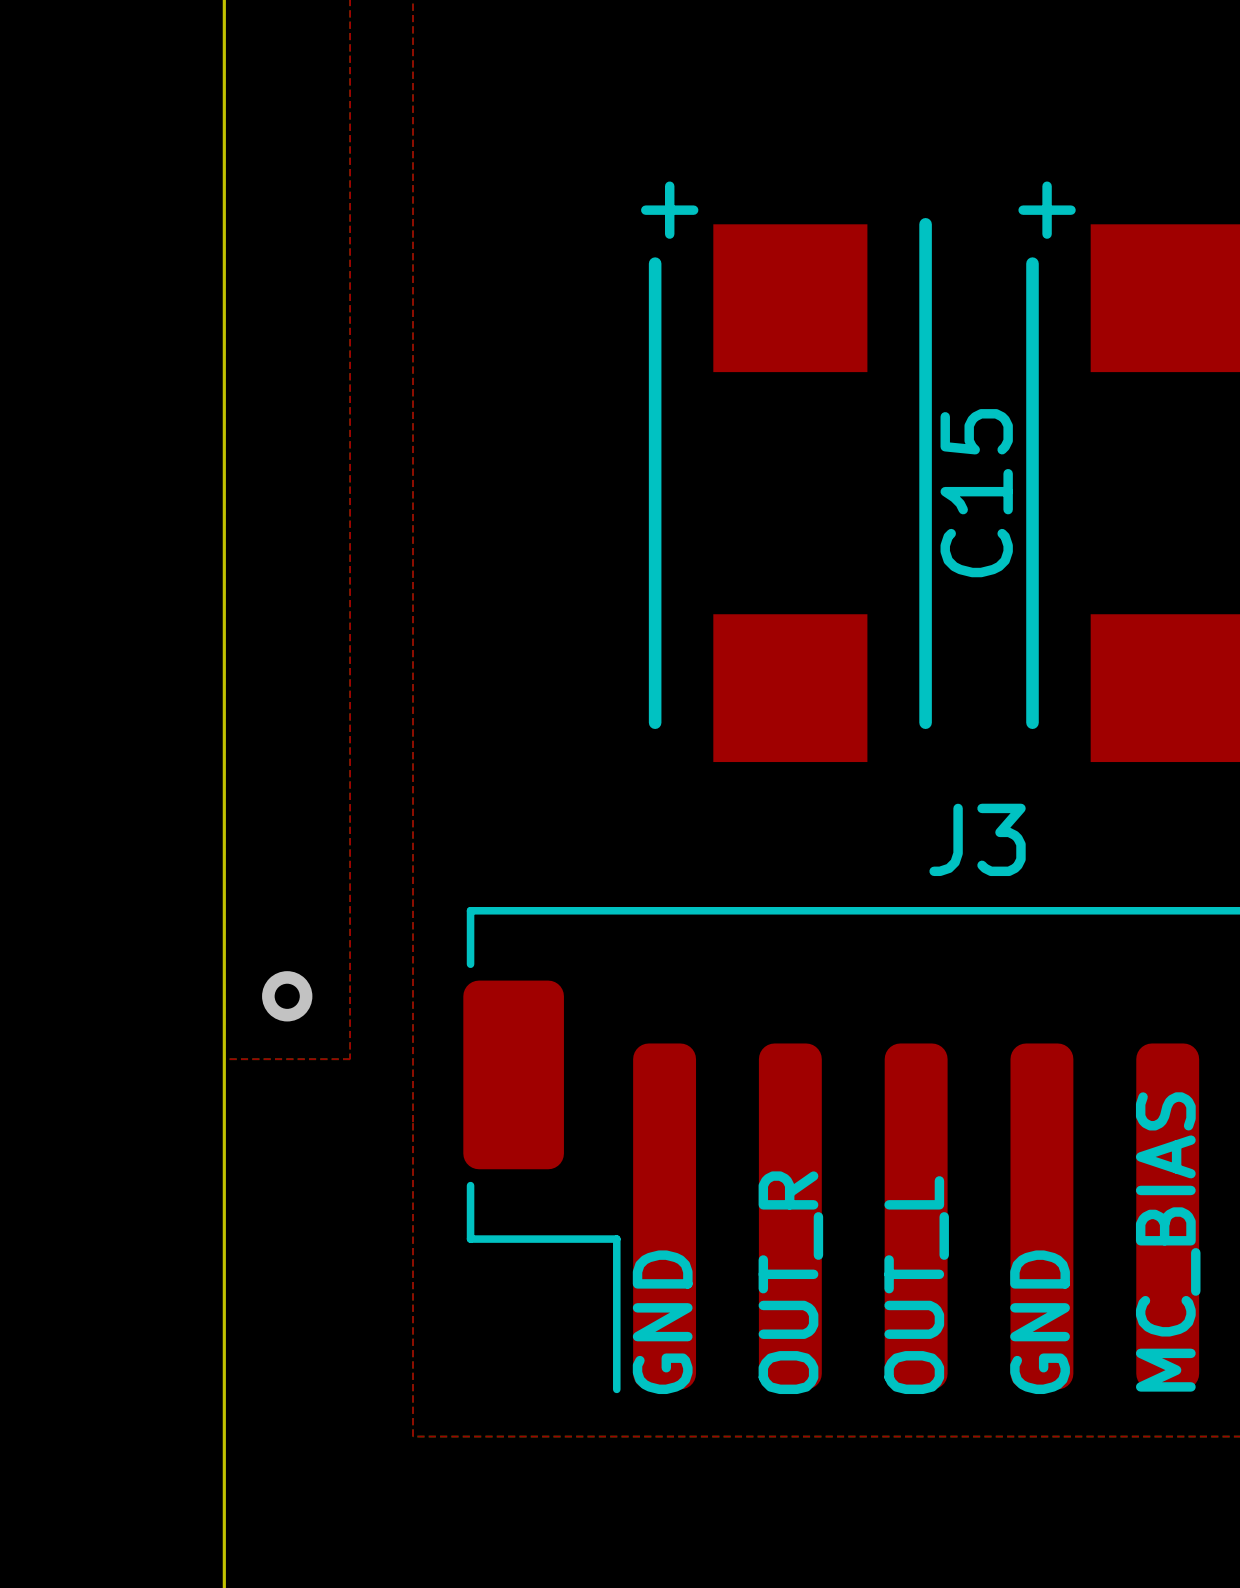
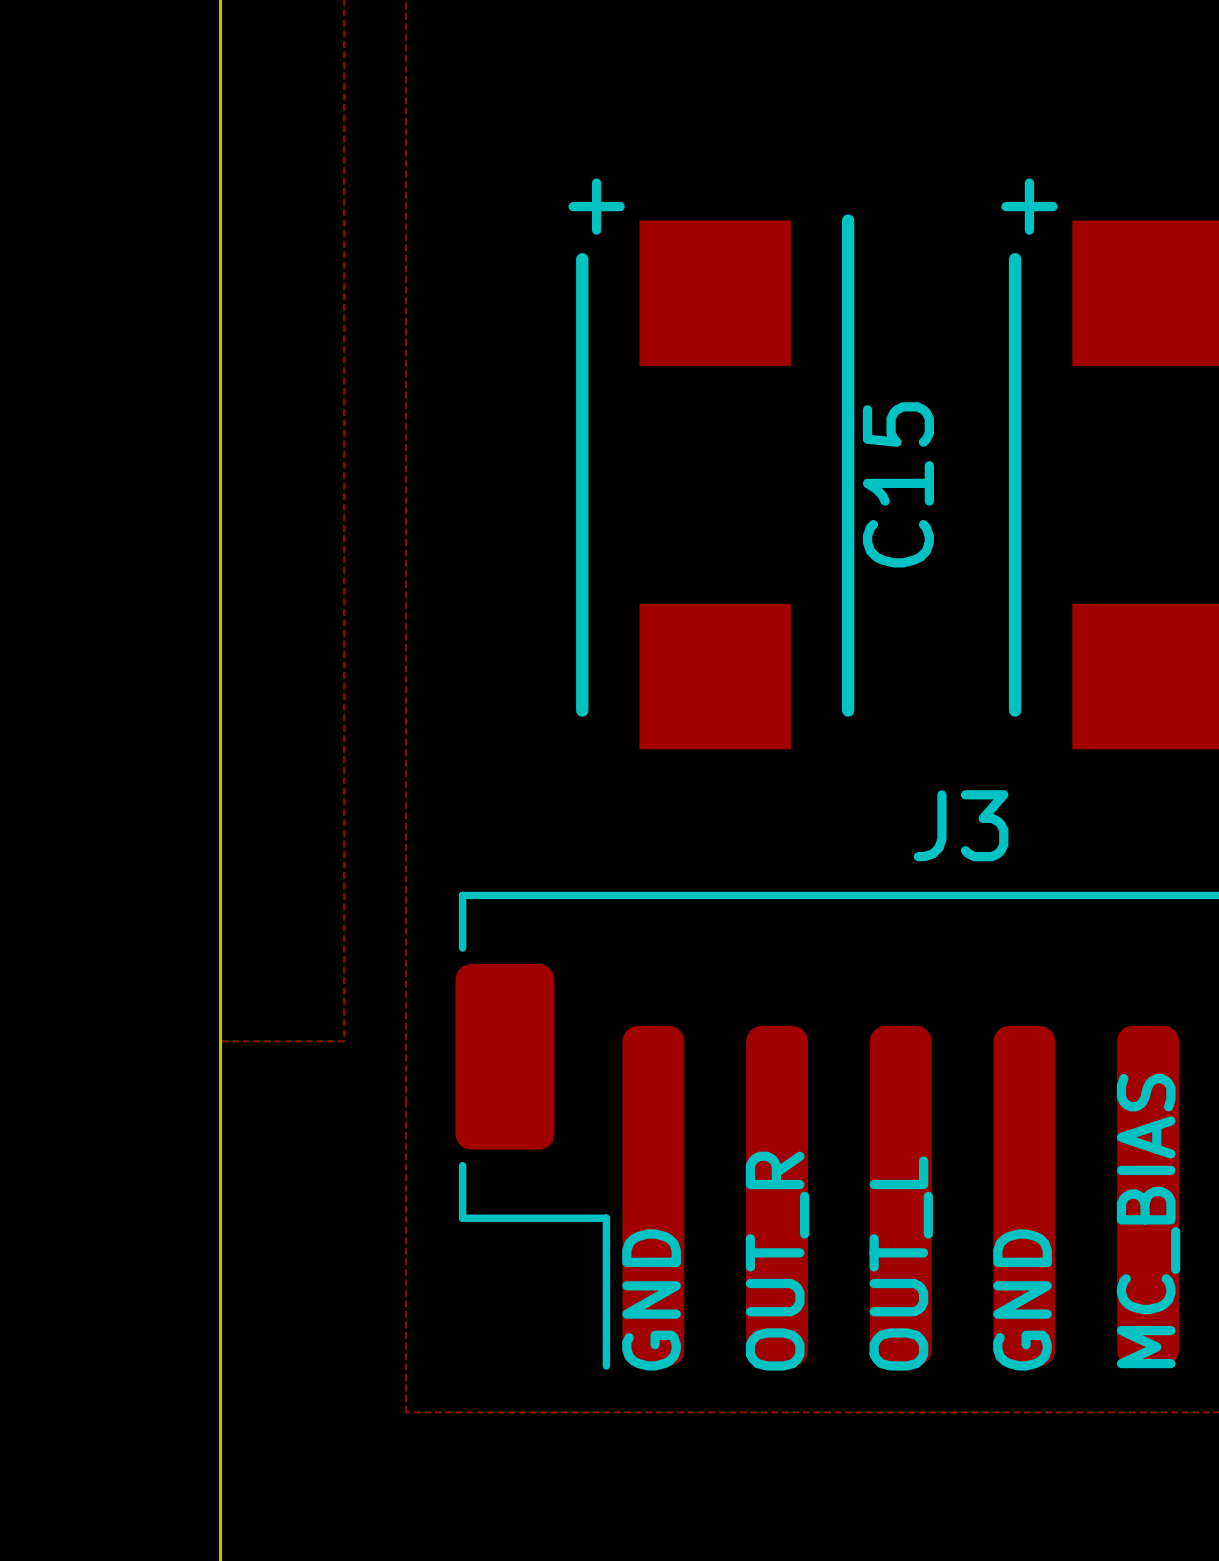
C15 position: (790, 490) -> (715, 481)
via: (287, 996) -> none

